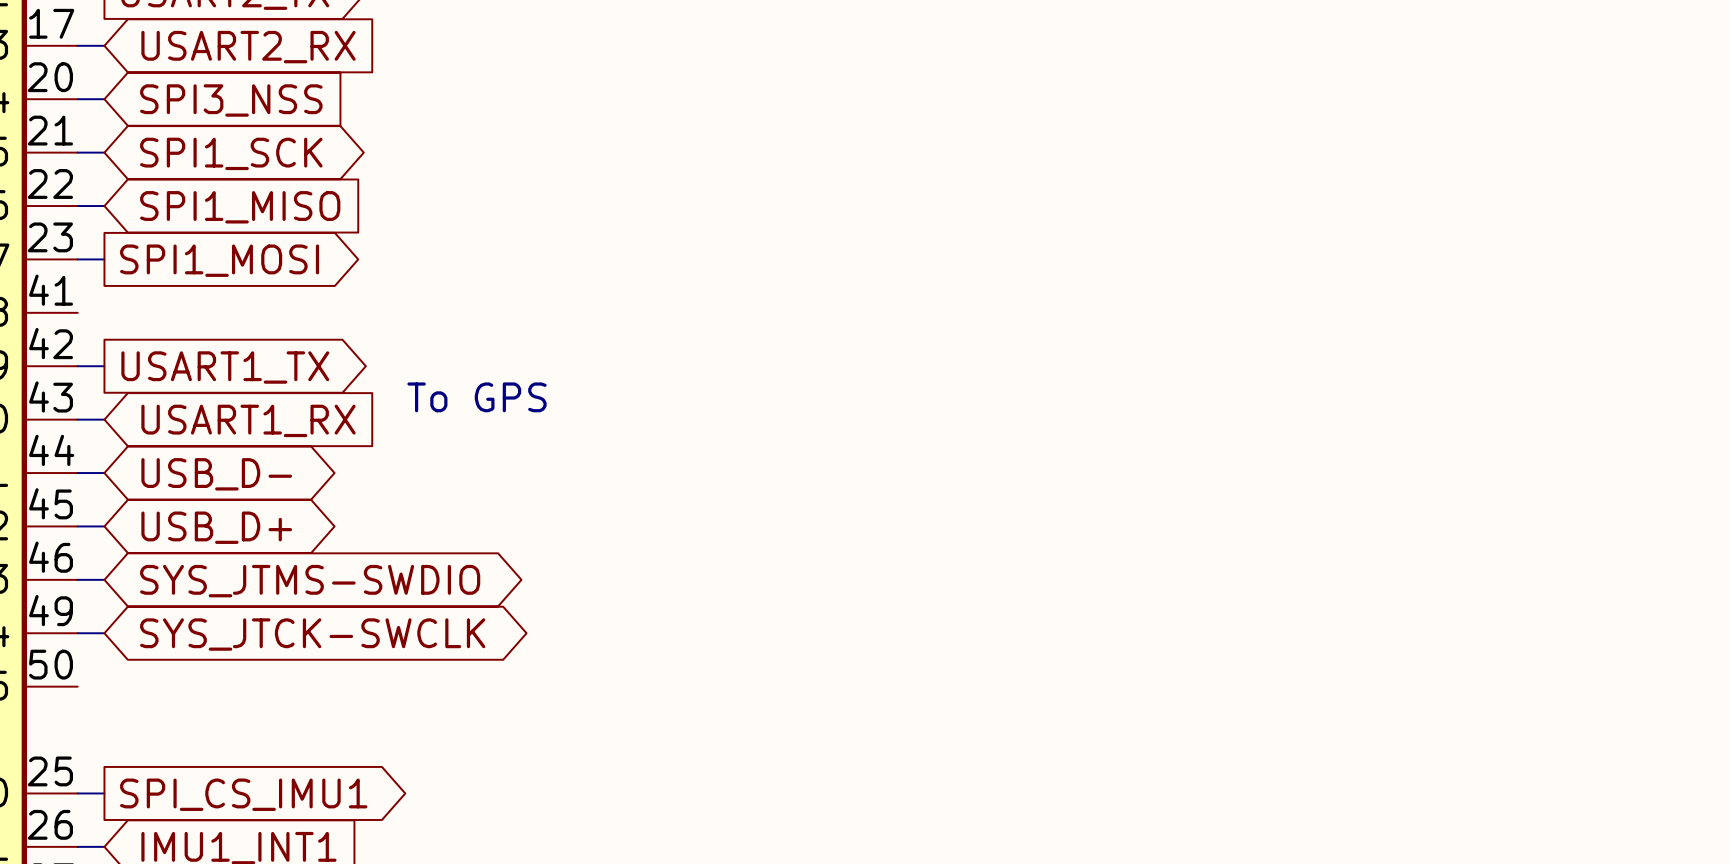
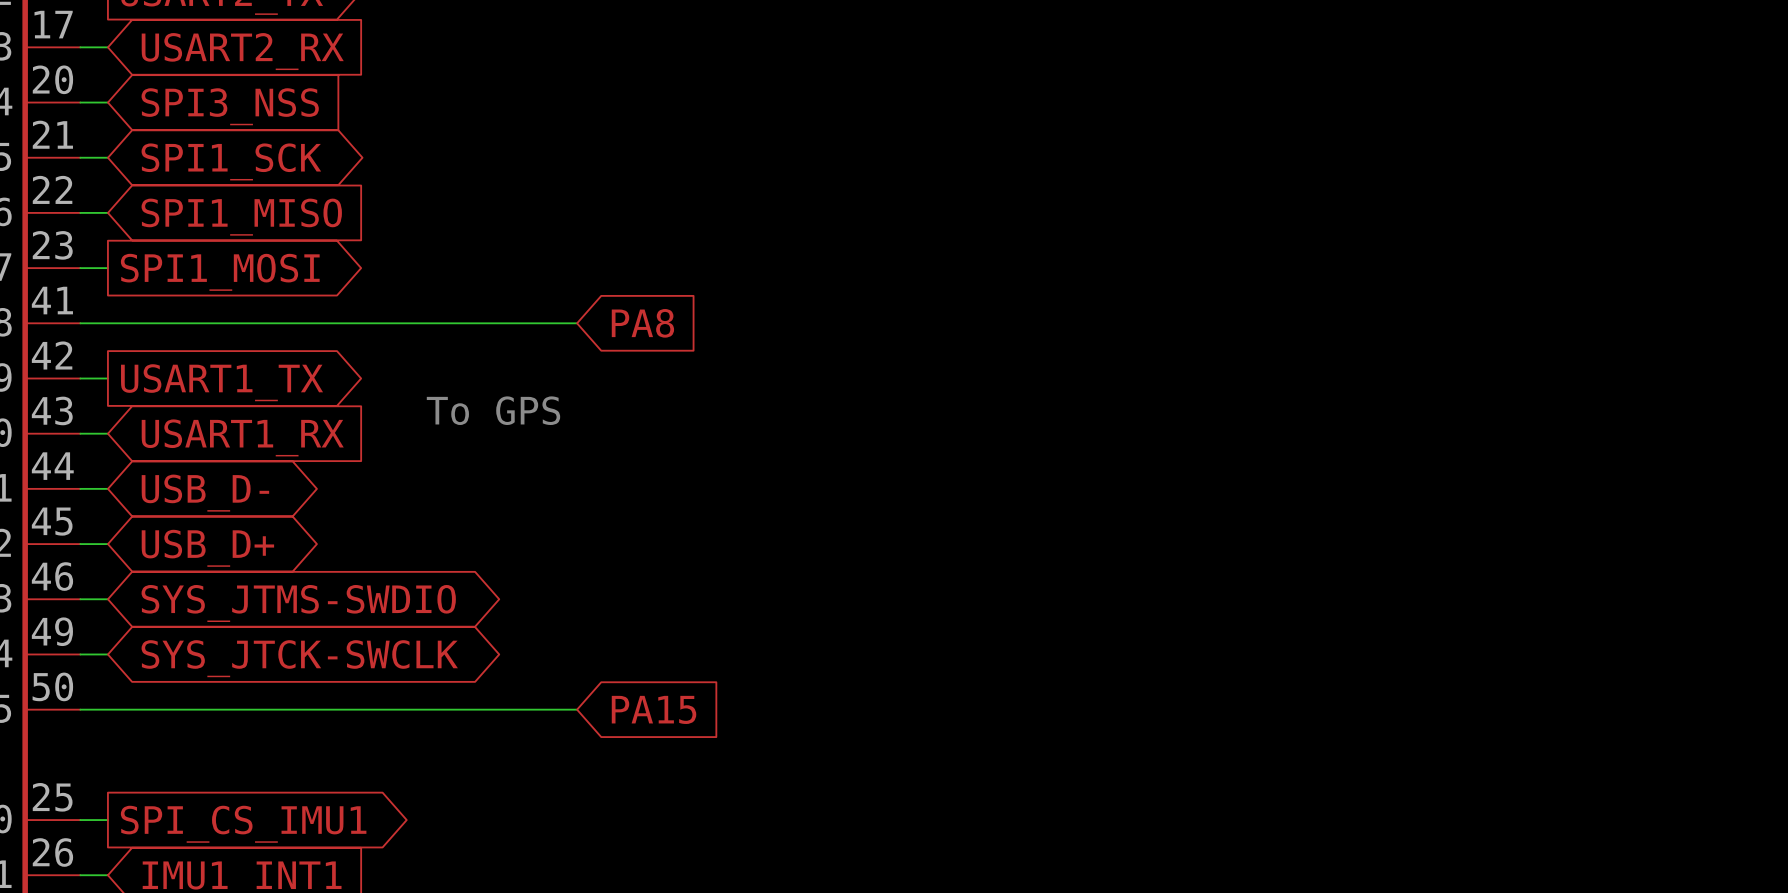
wire: none -> (80, 323) (577, 323)
global label: none -> PA8 (642, 323)
wire: none -> (80, 709) (577, 709)
global label: none -> PA15 (654, 709)

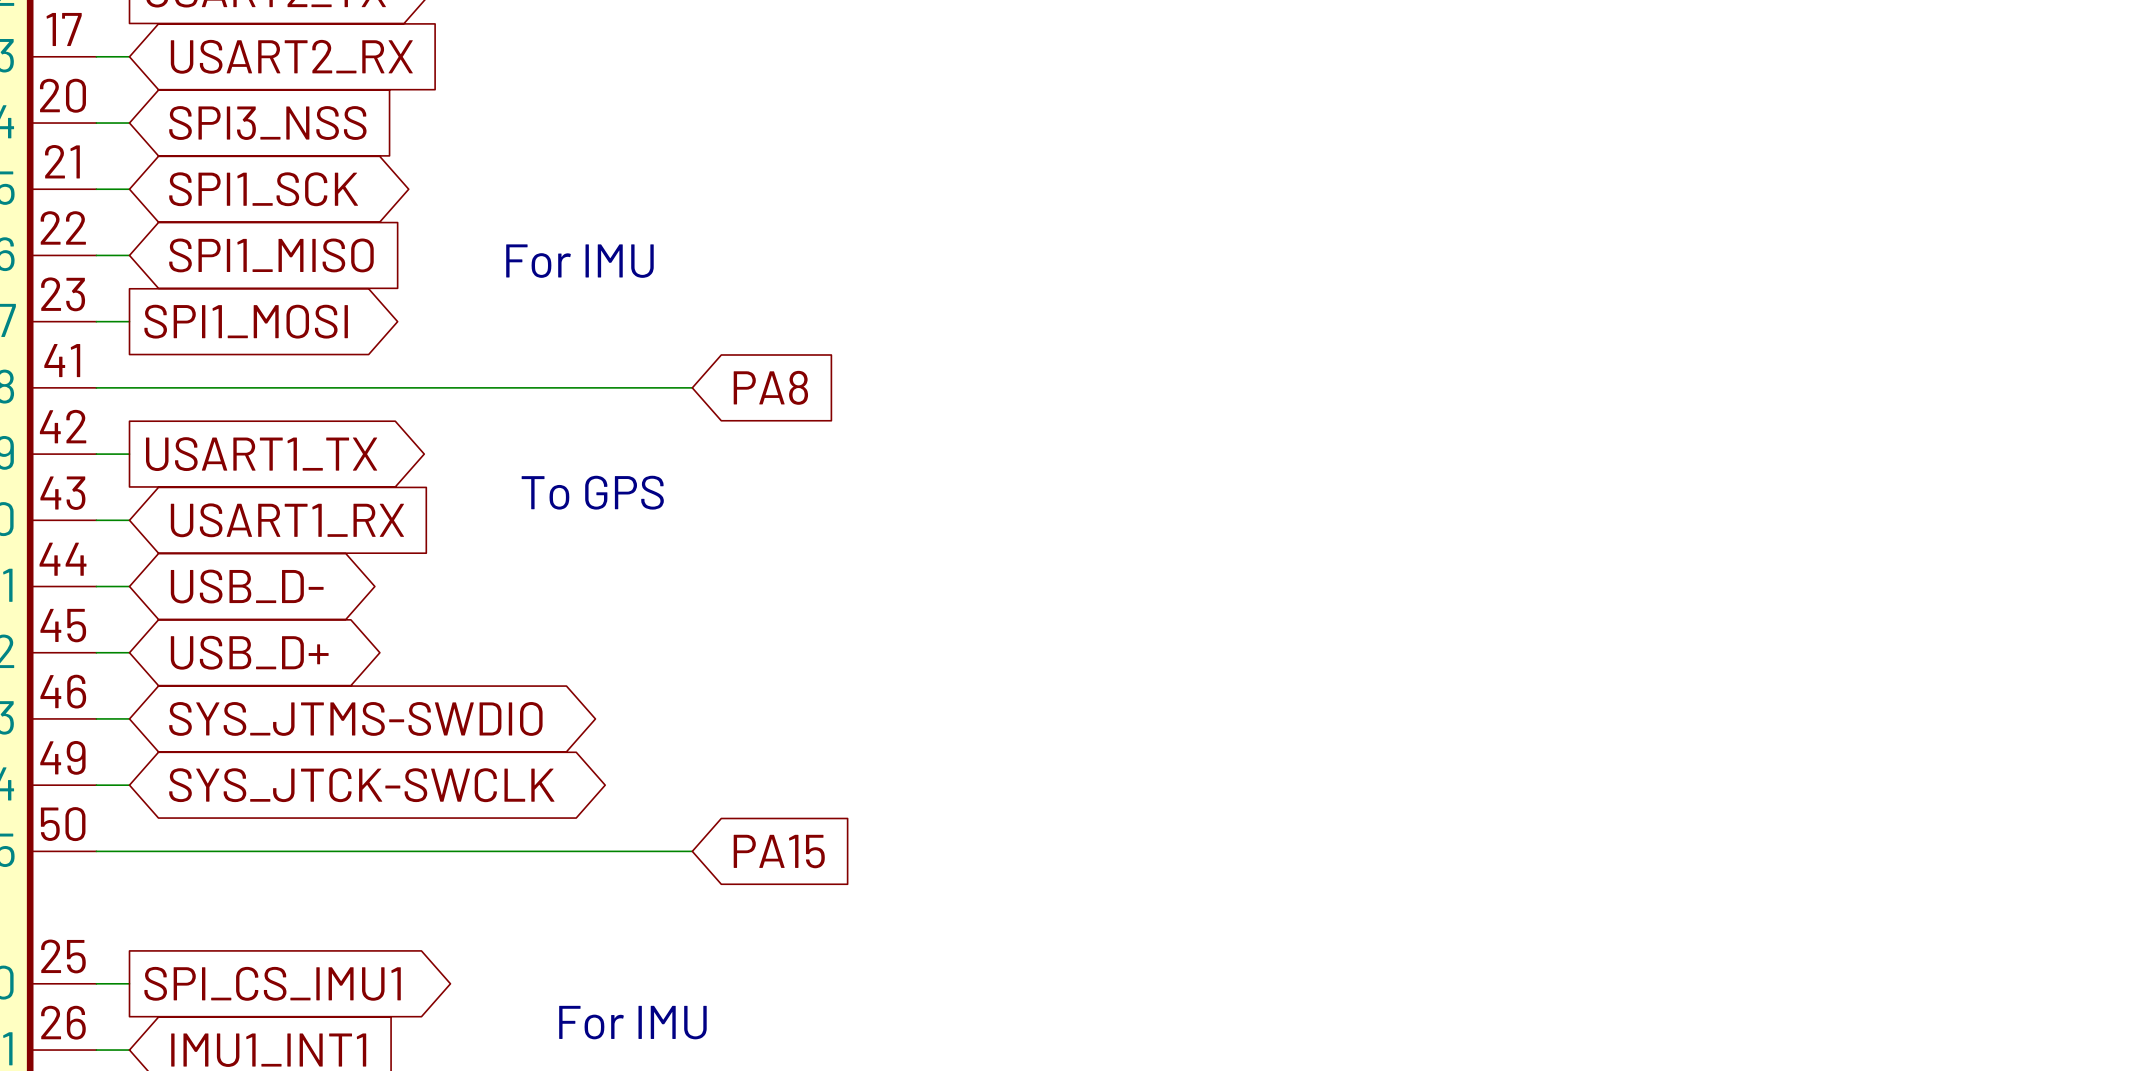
text: none -> For IMU (579, 261)
text: none -> For IMU (632, 1022)

